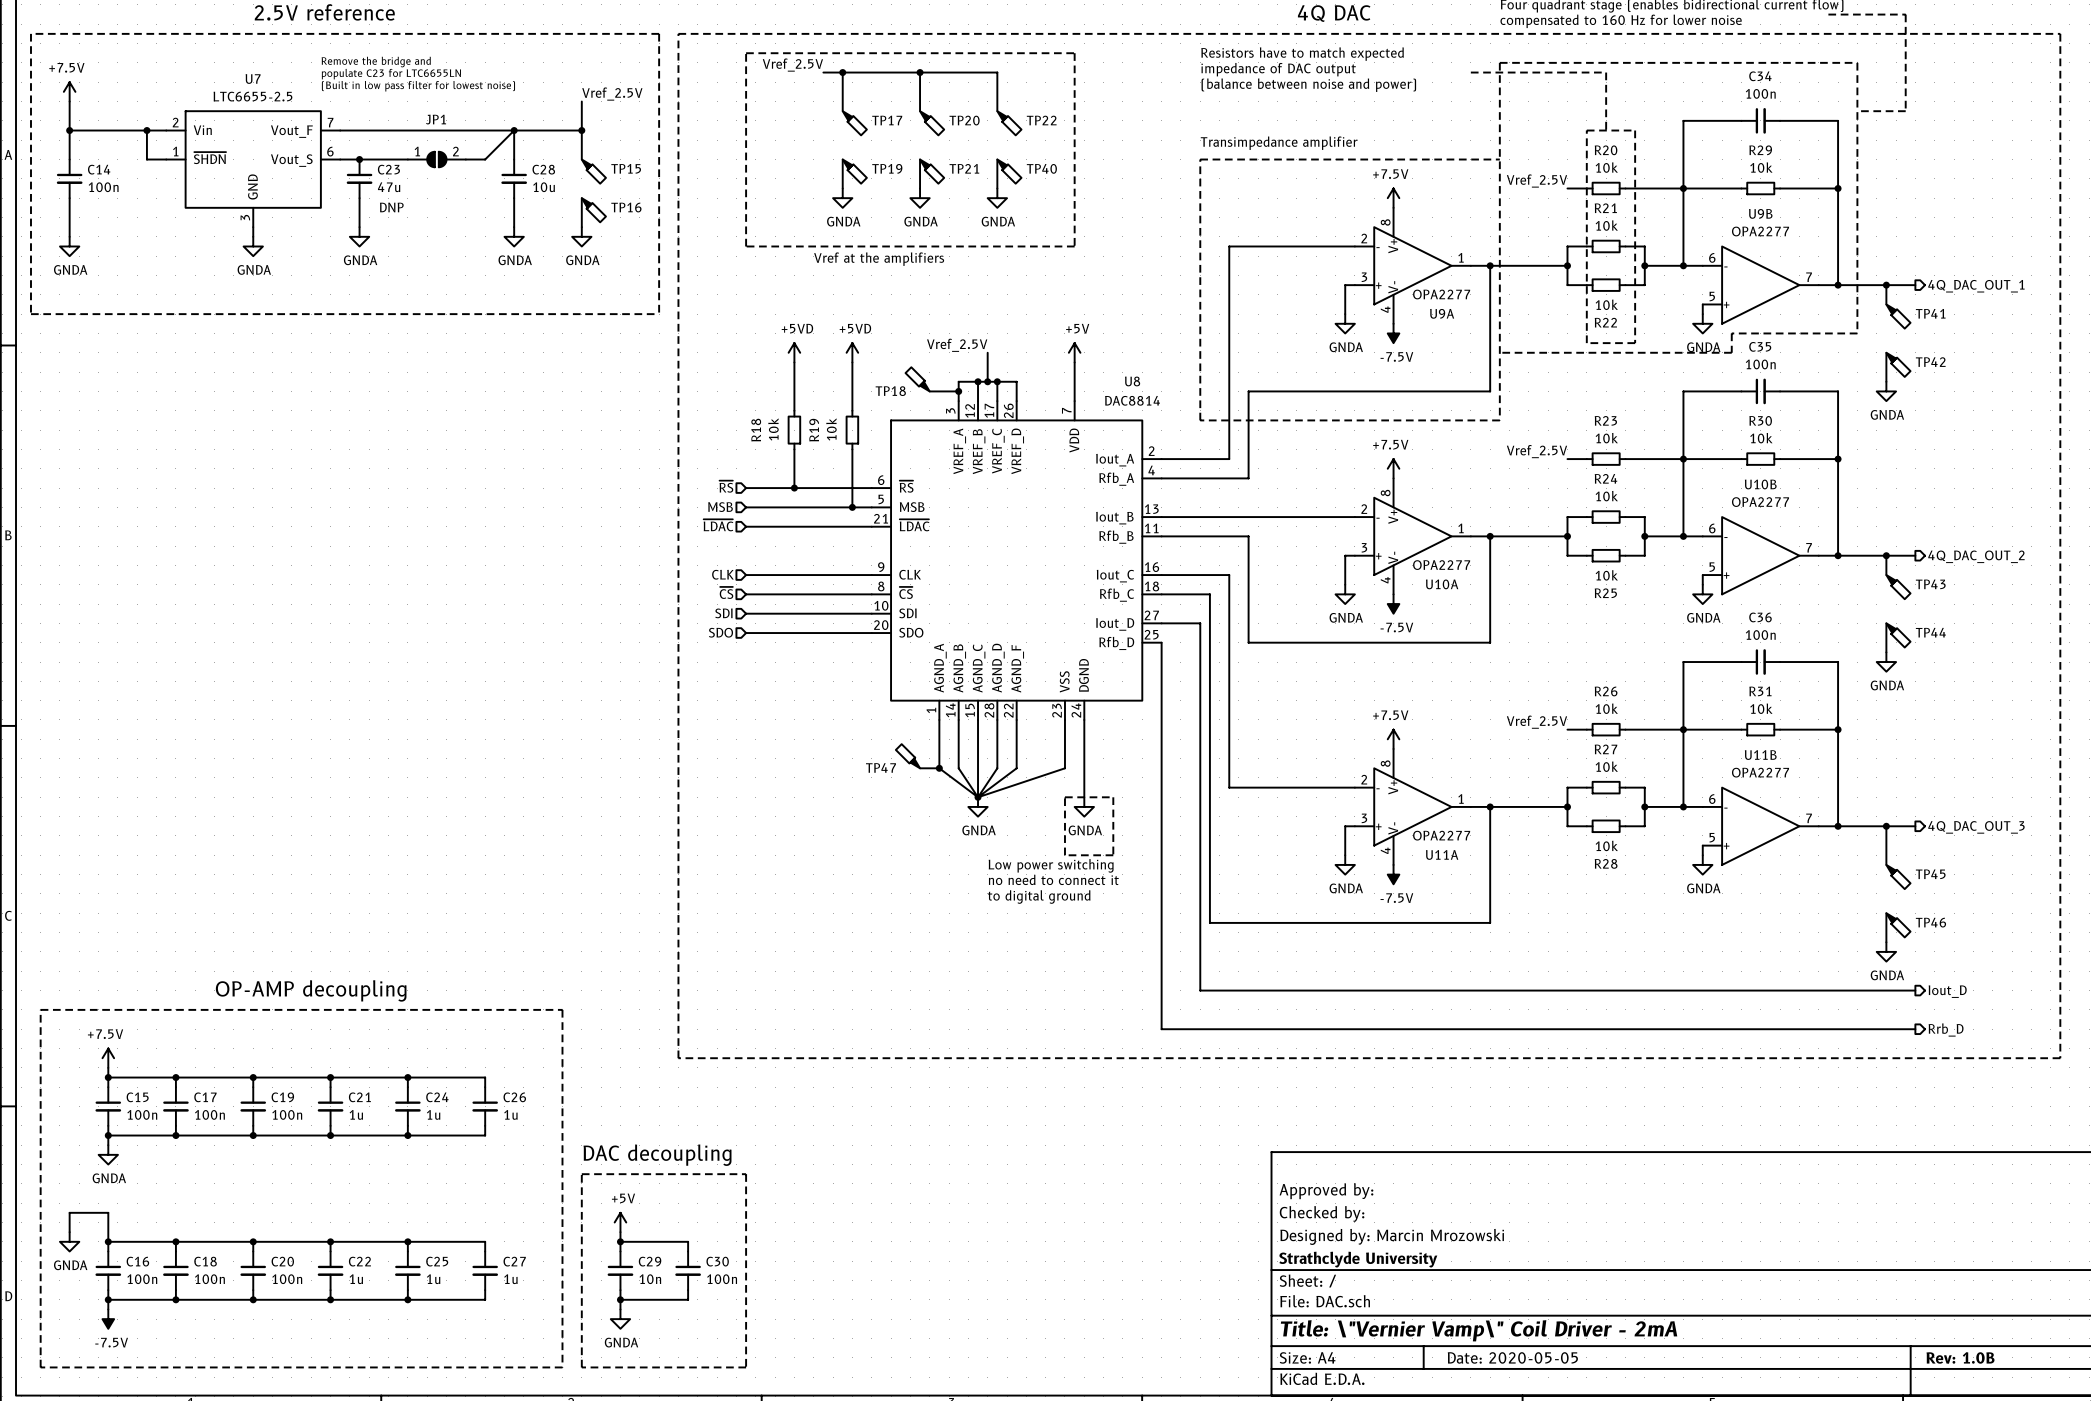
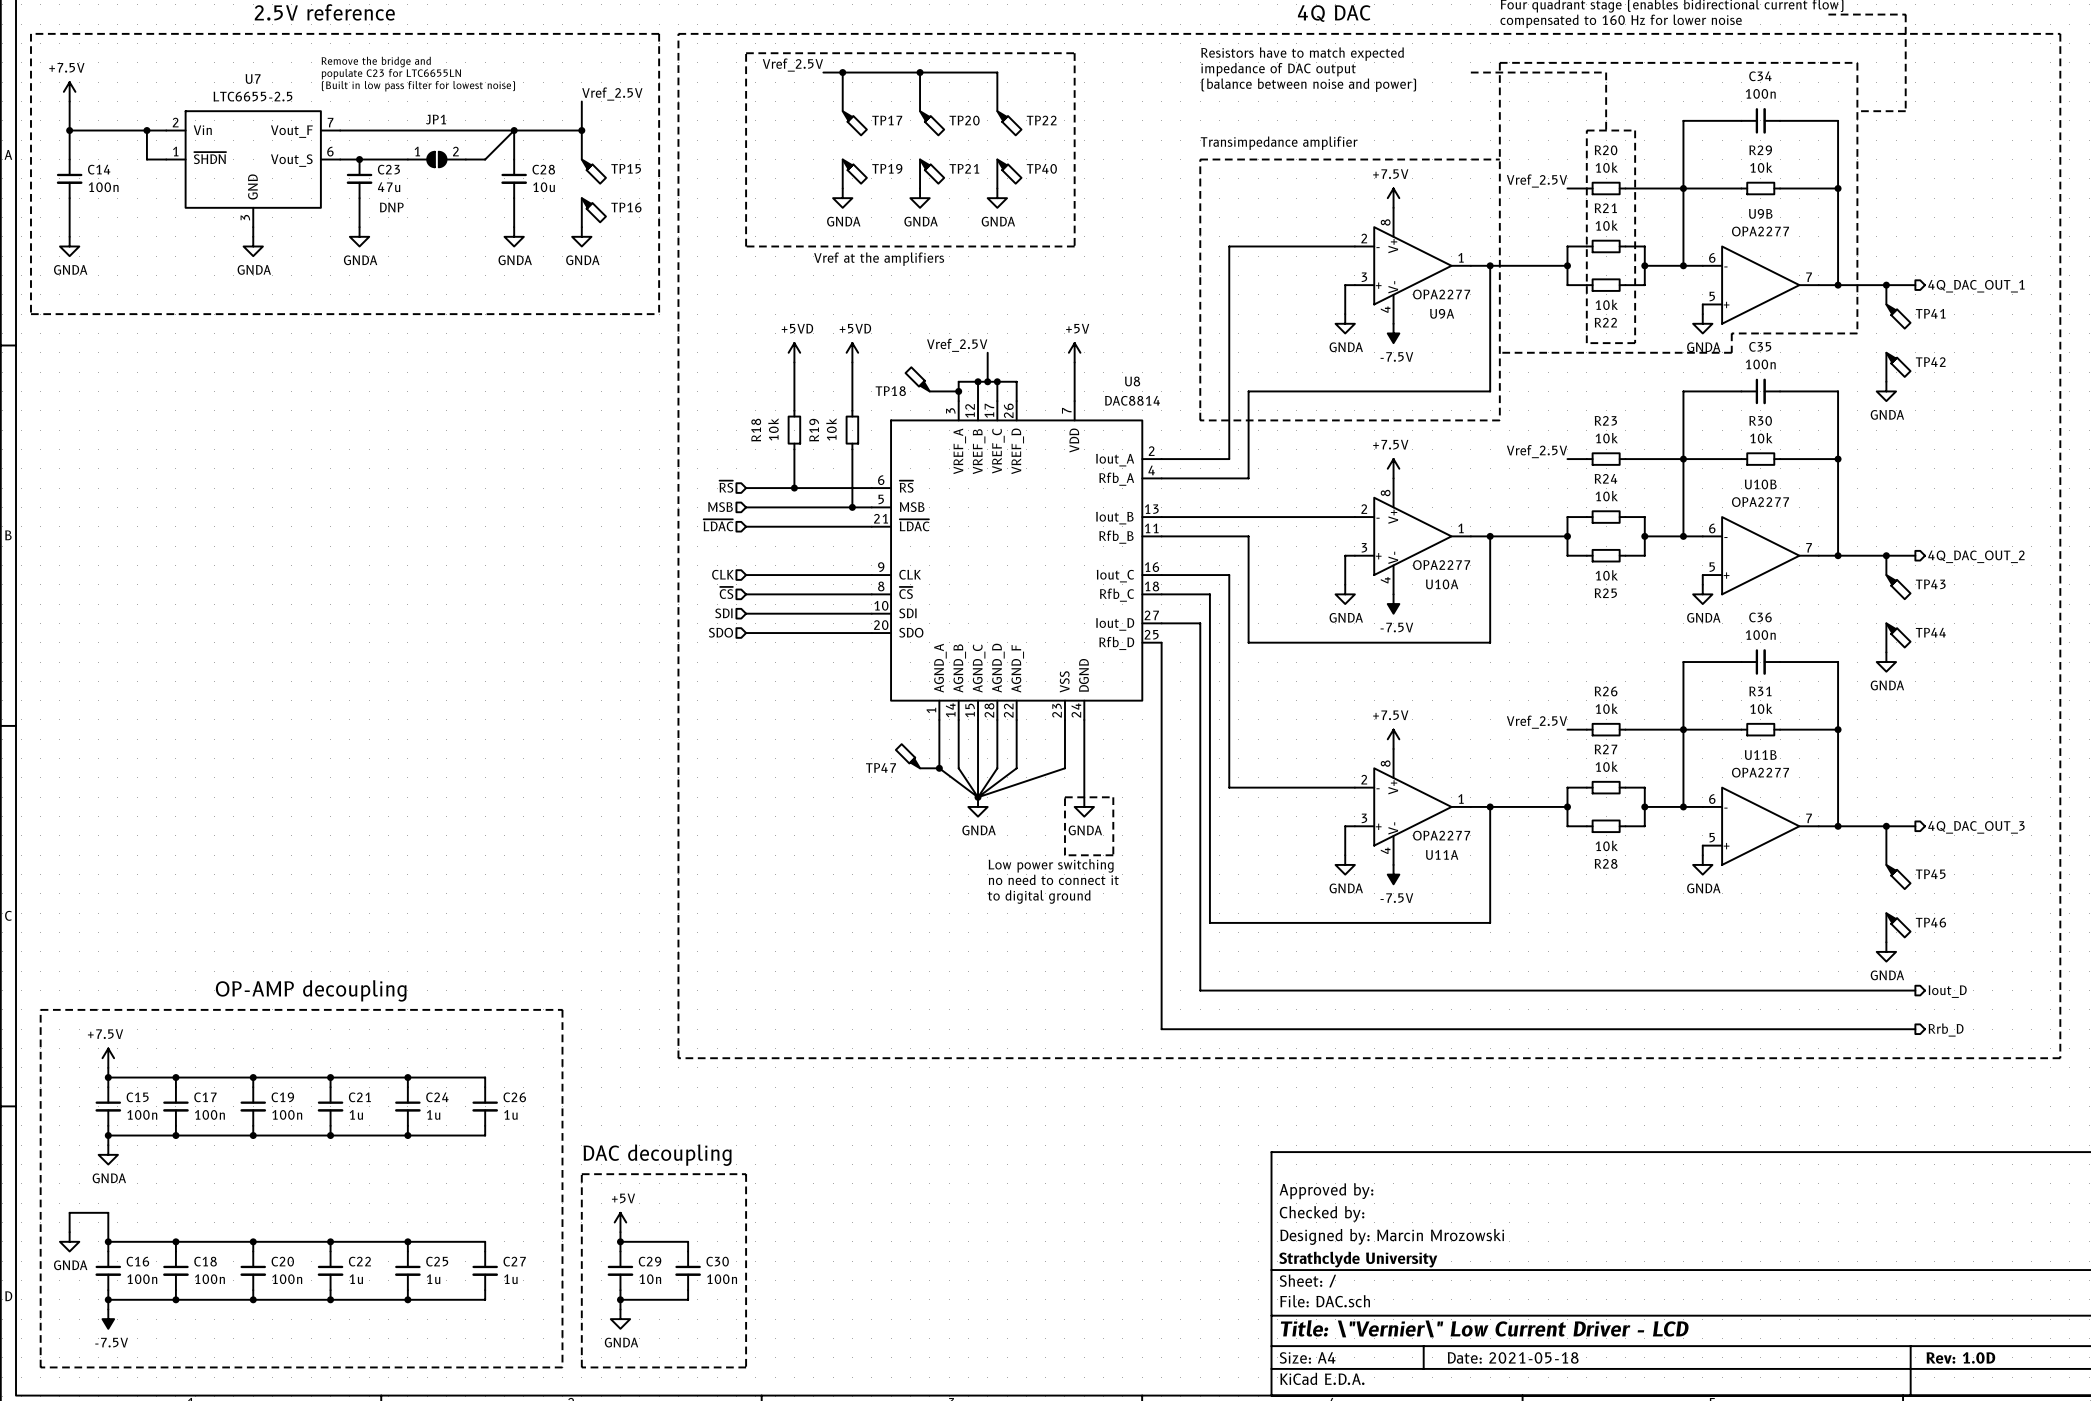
title block: Title: \"Vernier Vamp\" Coil Driver - 2mA (1479, 1330) -> Title: \"Vernier\" Low Current Driver - LCD (1484, 1328)
title block: Date: 2020-05-05 (1512, 1357) -> Date: 2021-05-18 (1513, 1357)
title block: Rev: 1.0B (1960, 1357) -> Rev: 1.0D (1960, 1357)

